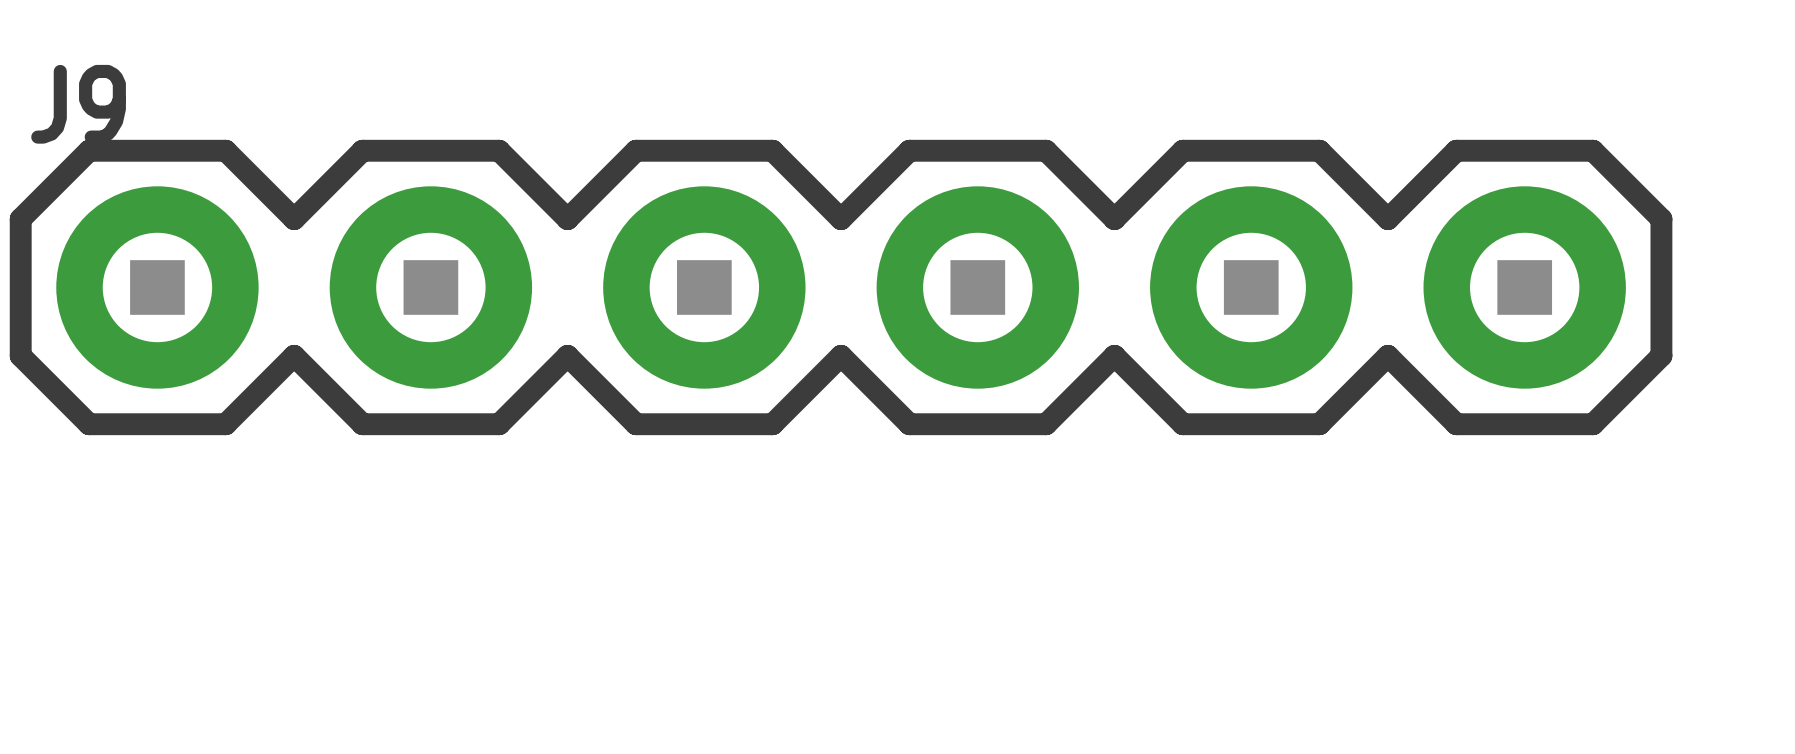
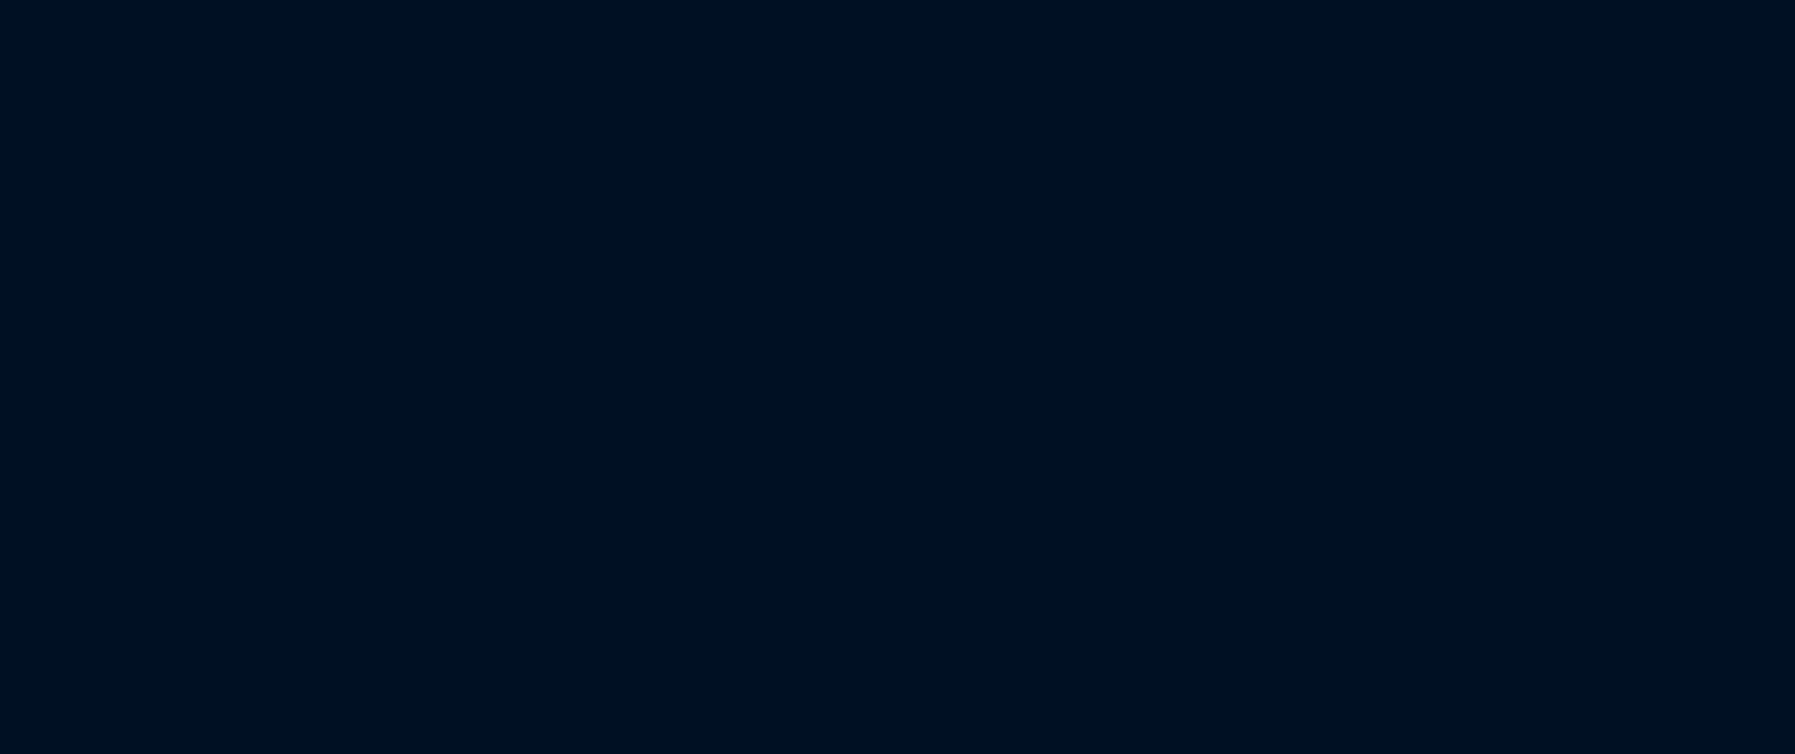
J9: (841, 287) -> none

